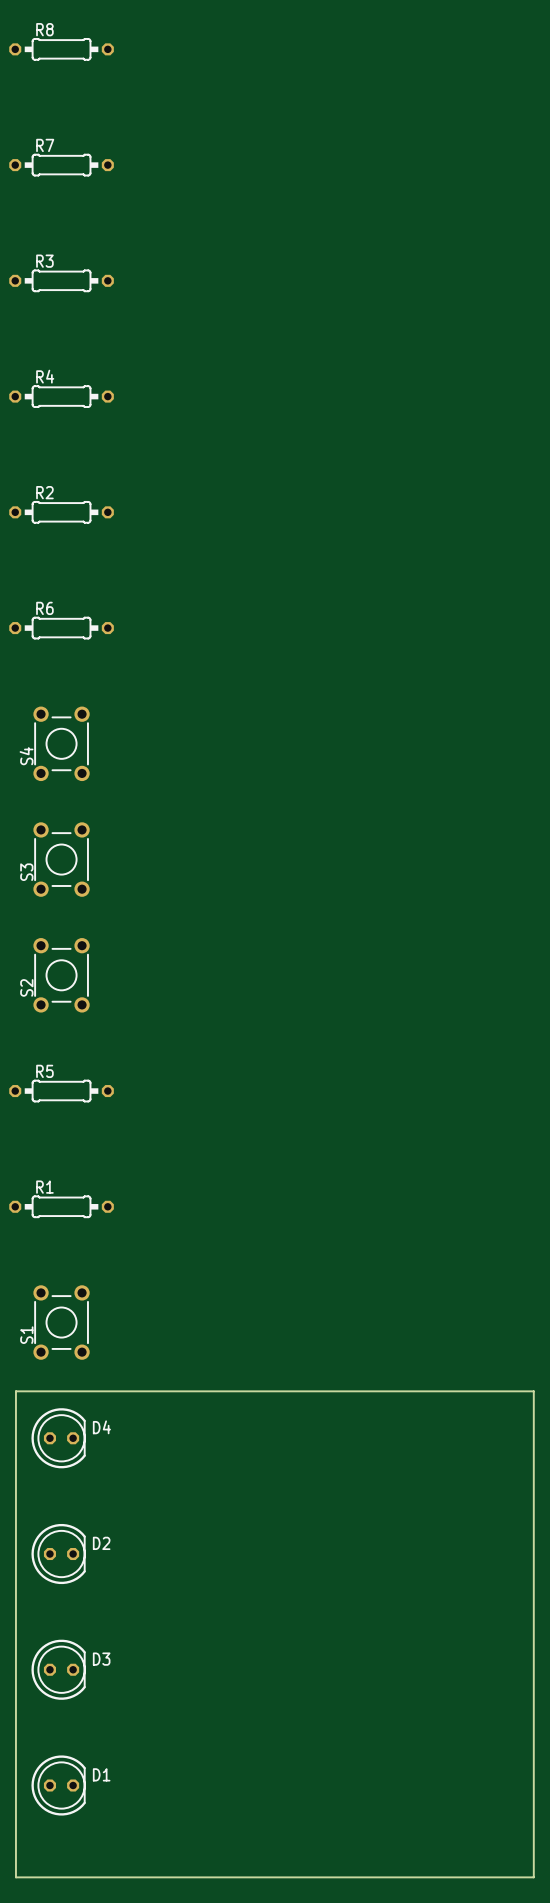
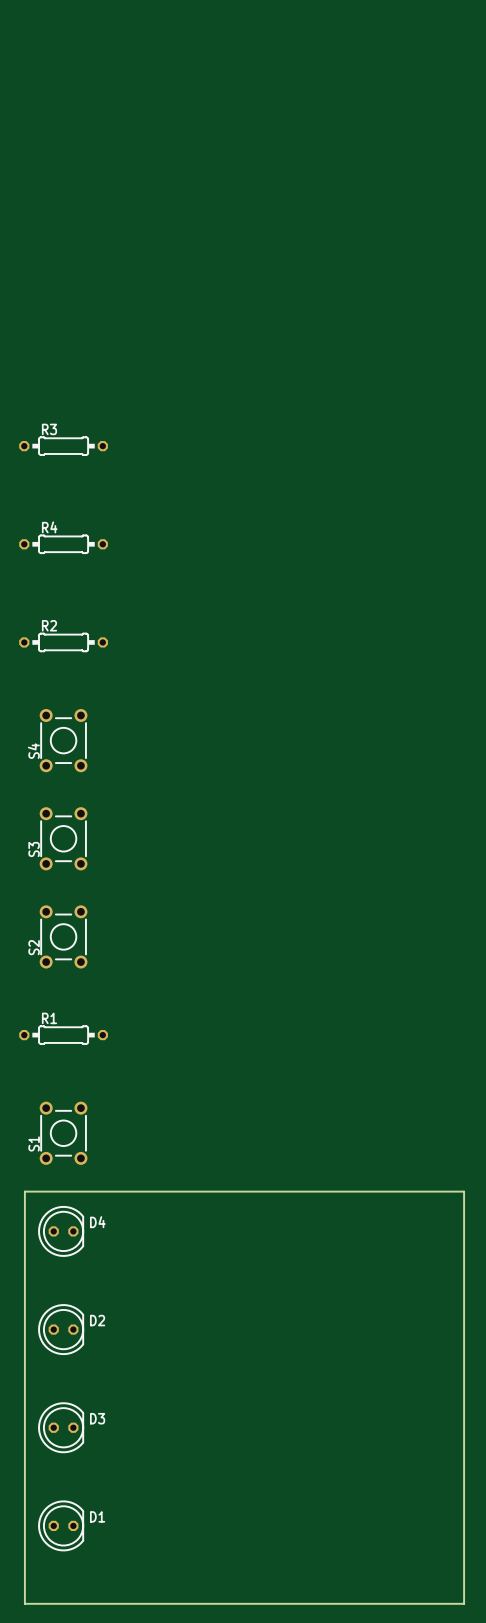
R8: (61, 49) -> none
R7: (61, 165) -> none
R3: (61, 280) -> none
R4: (61, 396) -> none
R2 name: R2 (44, 492) -> R3 (49, 429)
R6 name: R6 (44, 608) -> R4 (49, 527)
S4: (61, 743) -> none
R2: none -> (63, 642)
S3 name: S3 (26, 872) -> S4 (33, 751)
S2 name: S2 (26, 987) -> S3 (34, 849)
R5: (61, 1091) -> none
S2: none -> (63, 936)

